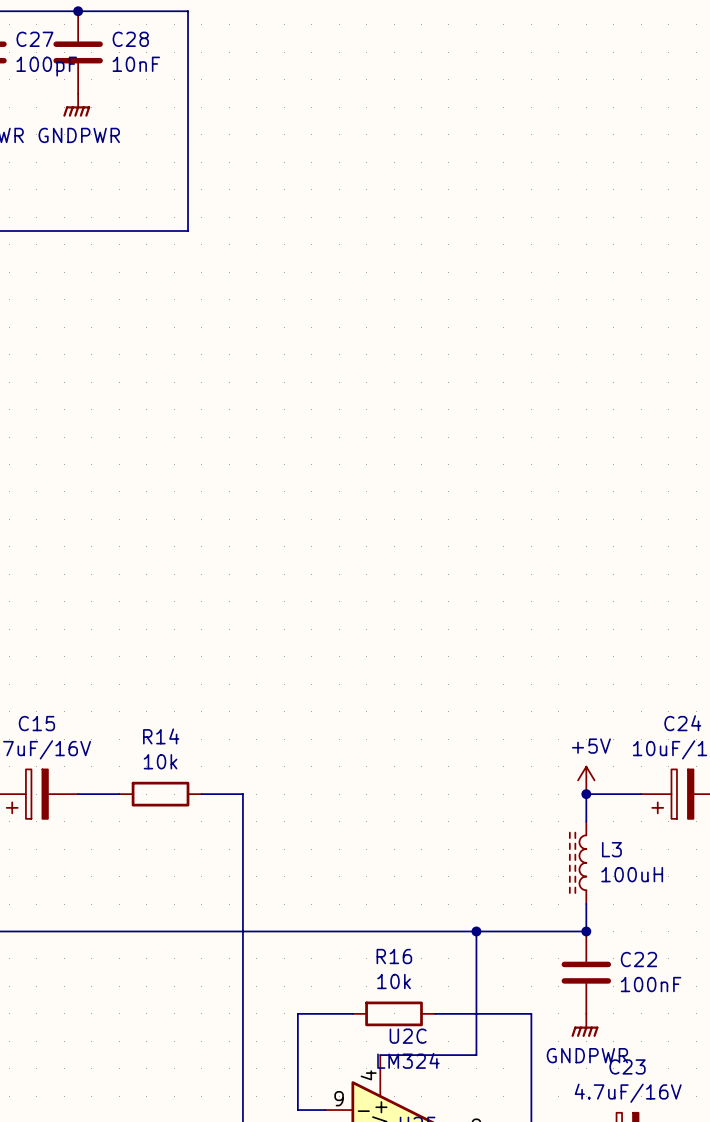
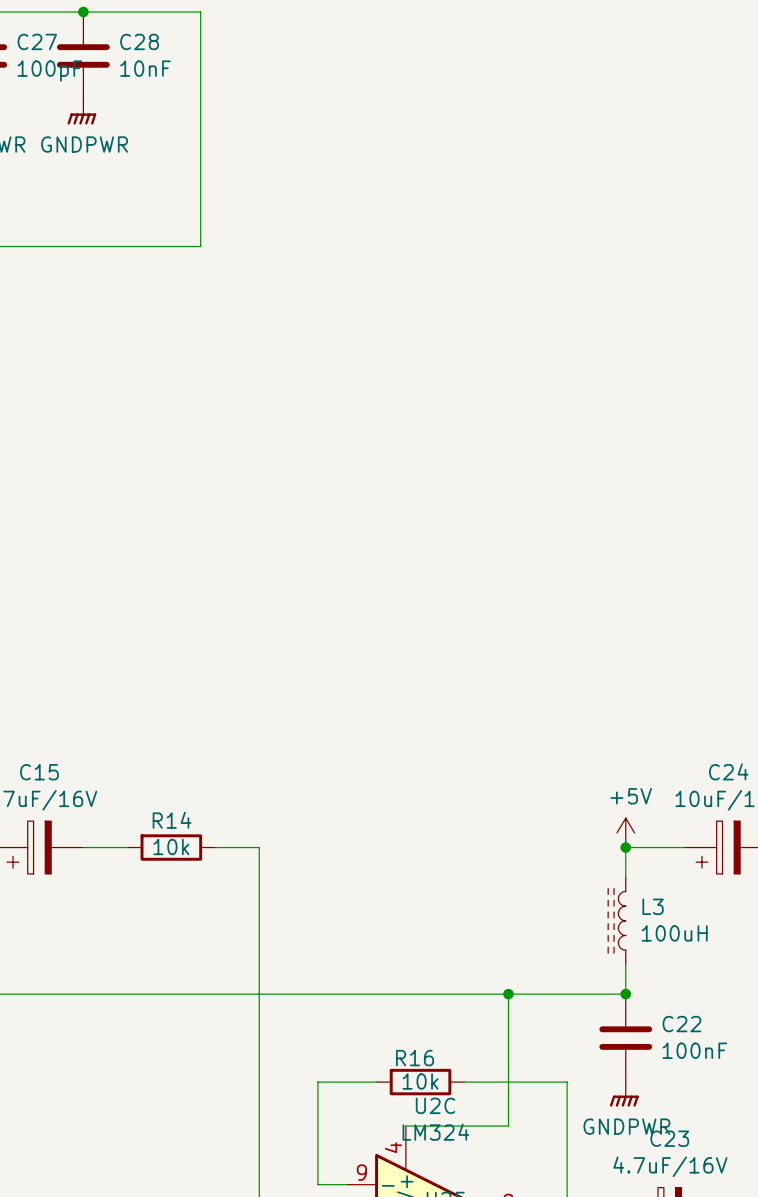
R14 name position: R14 (161, 736) -> R14 (172, 820)
R14 value position: 10k (160, 761) -> 10k (171, 846)
R16 name position: R16 (394, 956) -> R16 (415, 1058)
R16 value position: 10k (394, 981) -> 10k (420, 1081)

